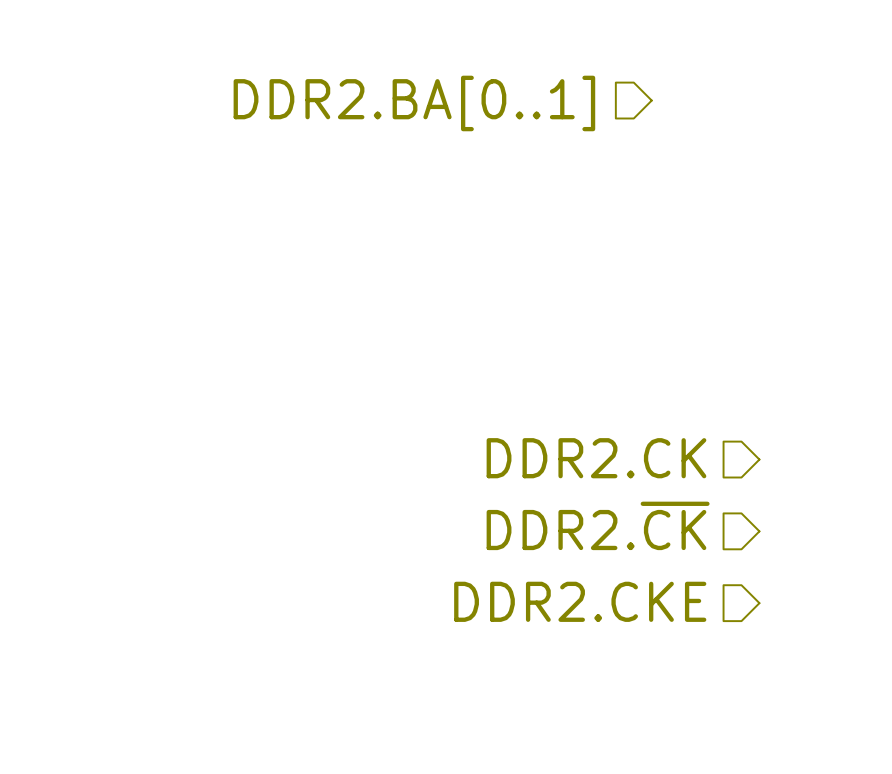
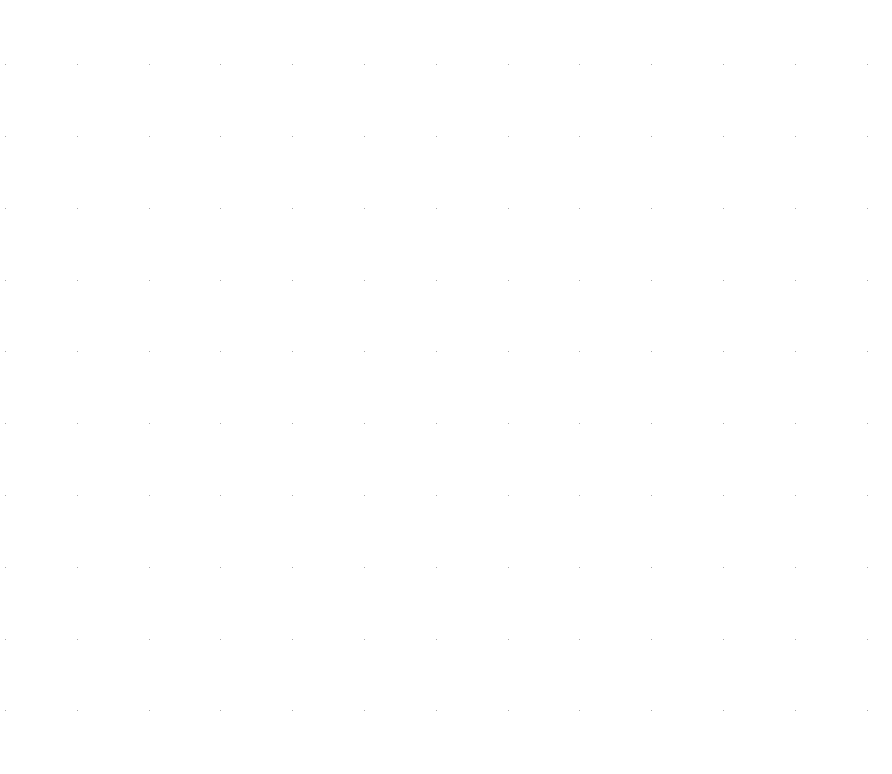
hierarchical label: DDR2.BA[0..1] (414, 103) -> none
hierarchical label: DDR2.CK (596, 458) -> none
hierarchical label: DDR2.~{CK} (598, 525) -> none
hierarchical label: DDR2.CKE (580, 601) -> none

